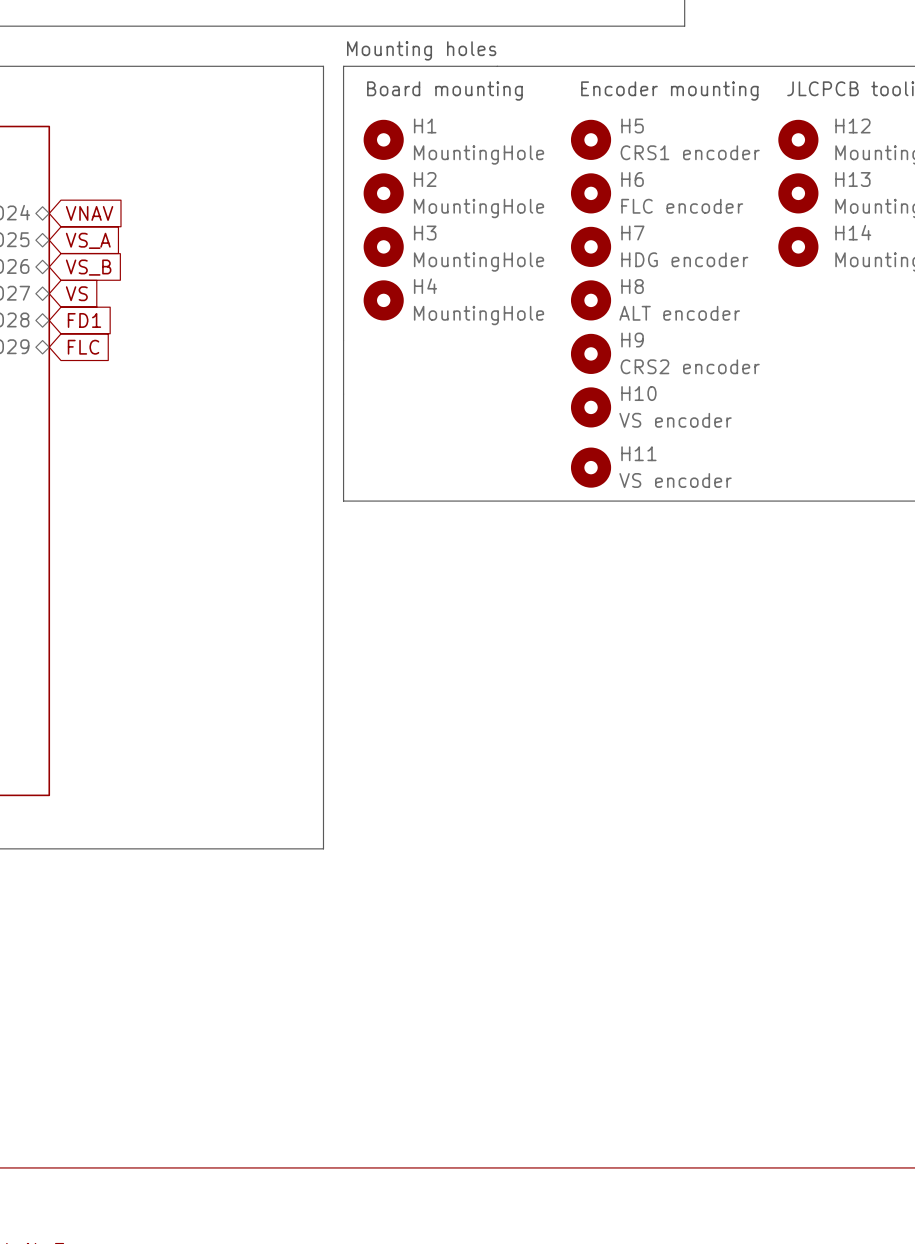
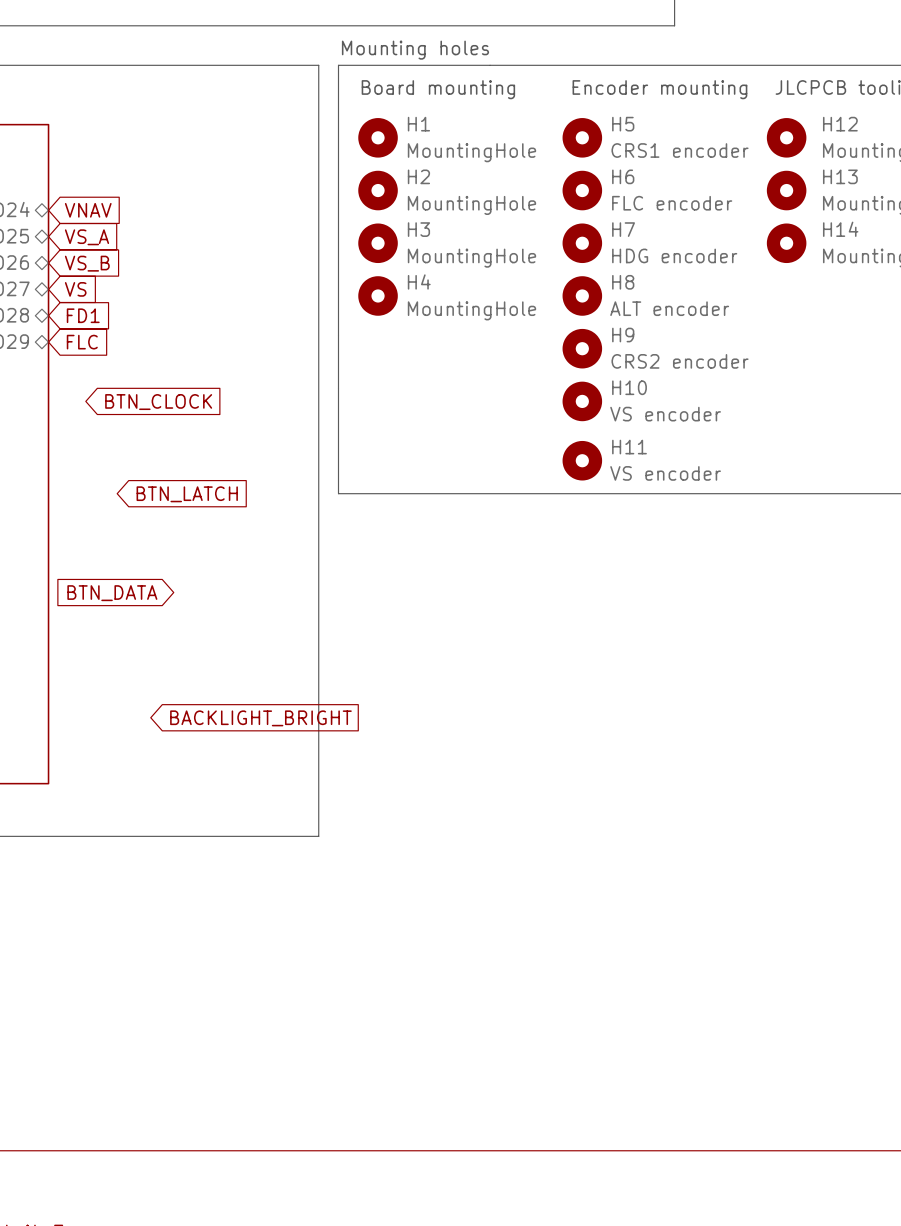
global label: none -> BTN_CLOCK (158, 402)
global label: none -> BTN_LATCH (187, 494)
global label: none -> BTN_DATA (112, 593)
global label: none -> BACKLIGHT_BRIGHT (260, 718)

